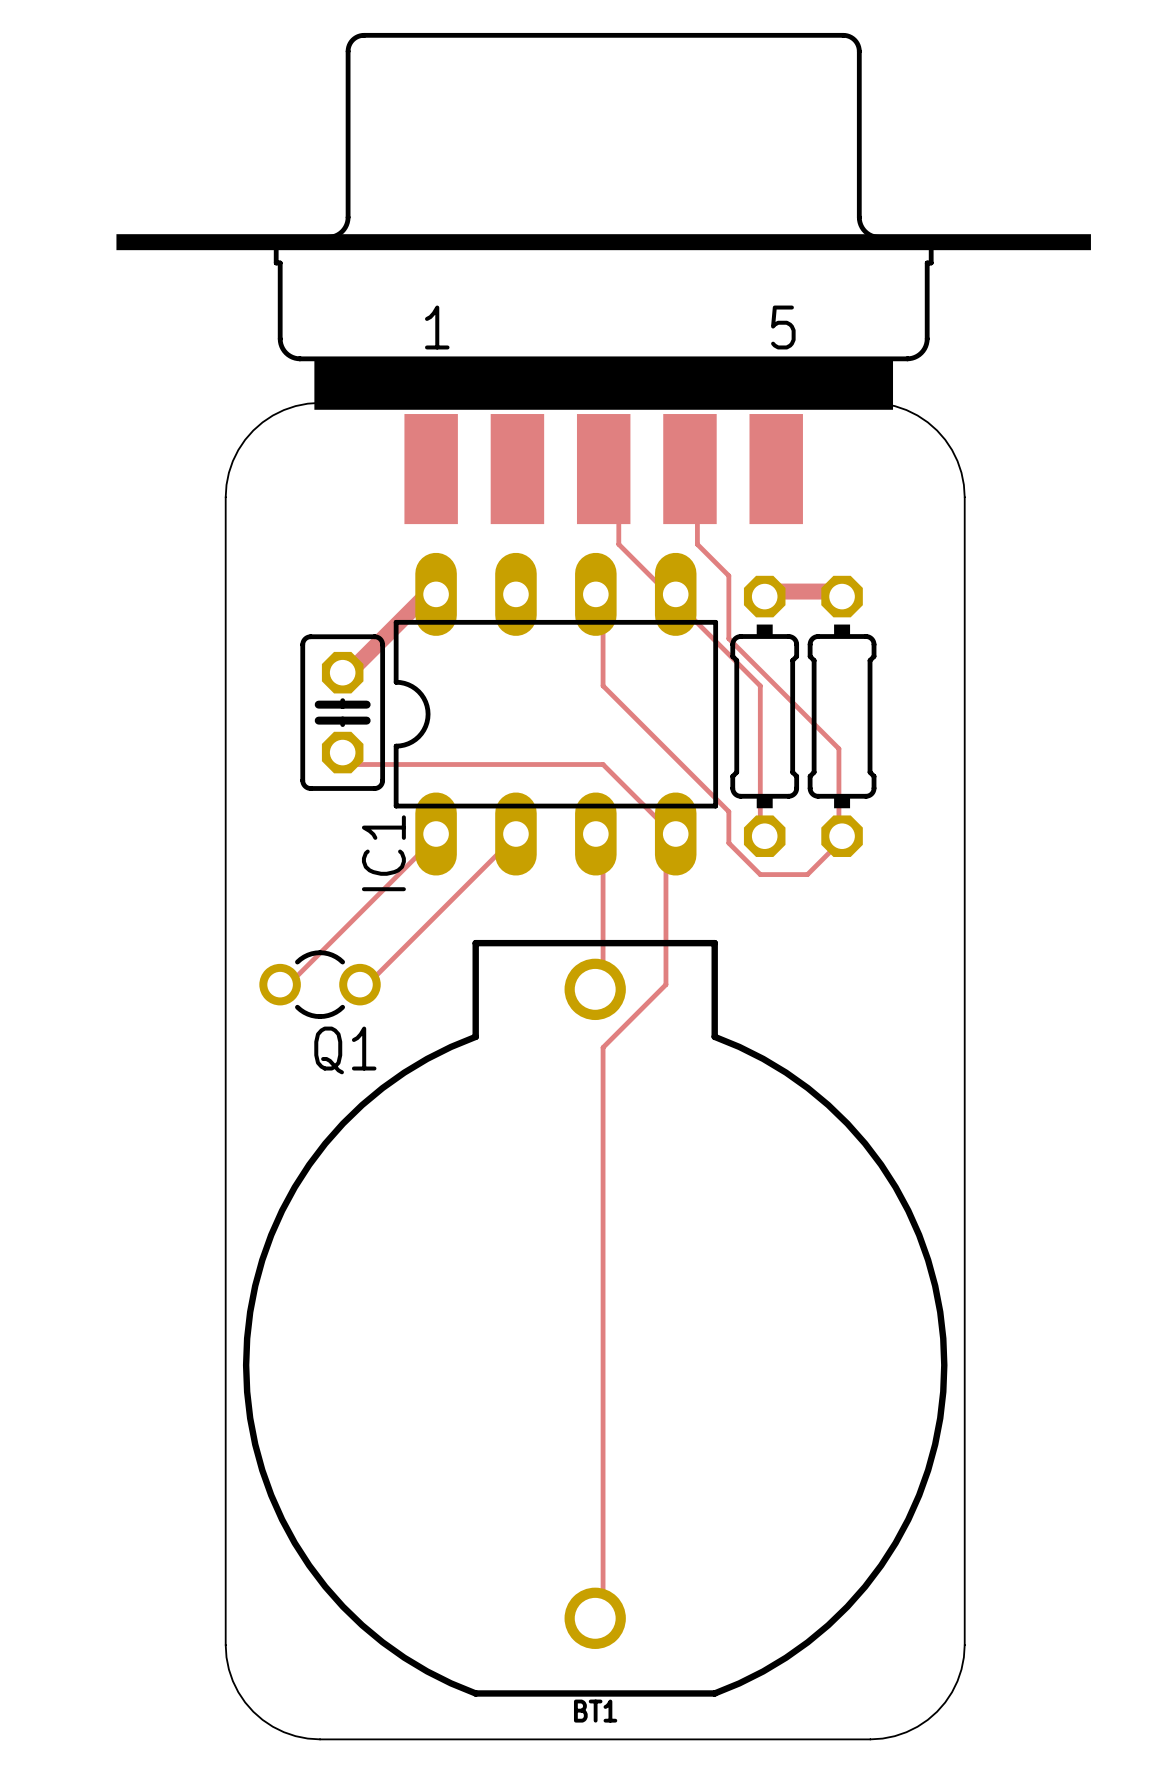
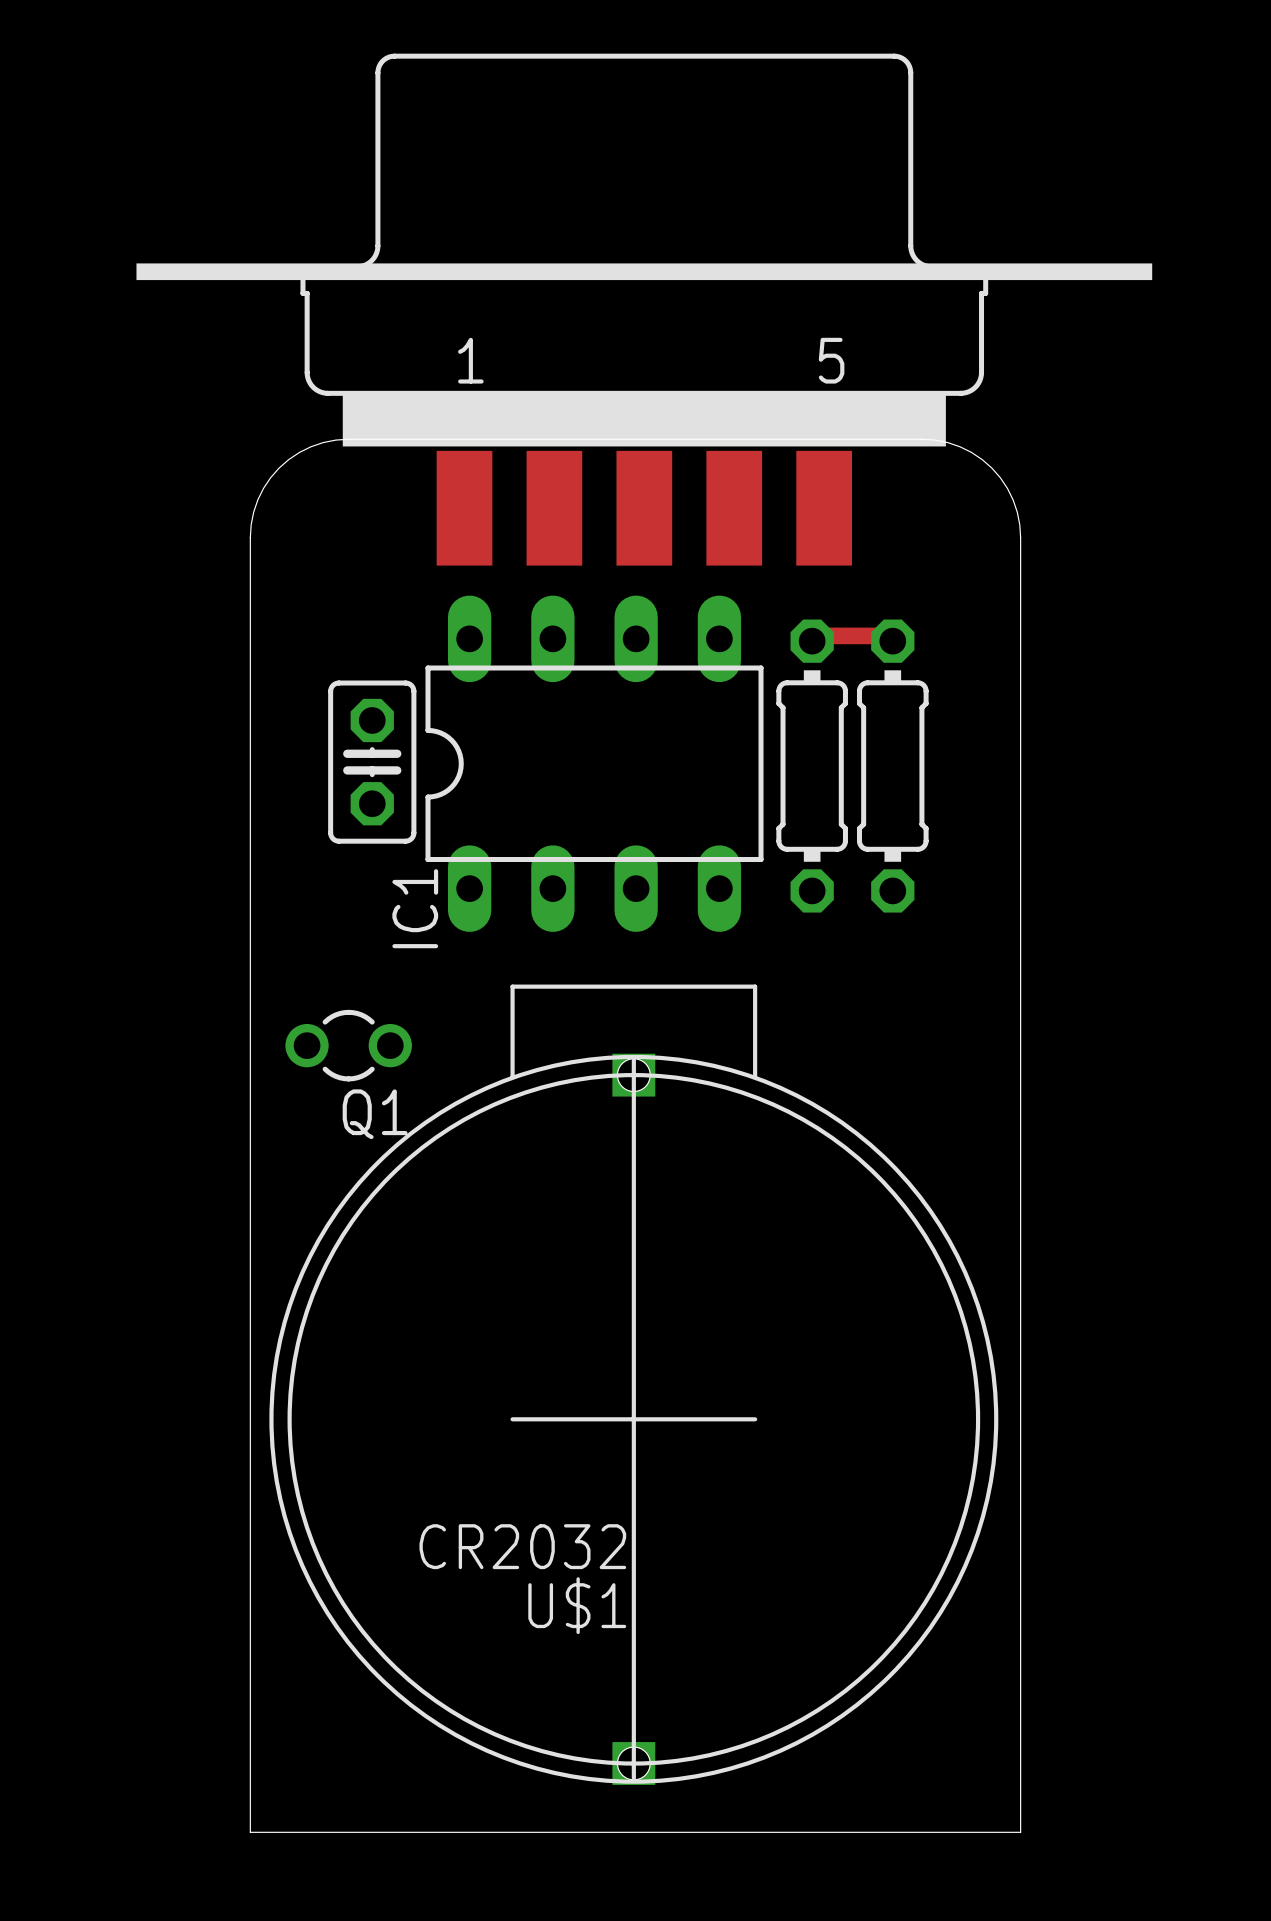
track: (603, 469) (618, 481) (618, 544) (665, 591) (675, 594) (681, 607) (760, 685) (760, 827) (764, 836) -> none
track: (689, 469) (697, 481) (697, 544) (728, 575) (728, 638) (838, 748) (838, 827) (842, 836) (838, 843) (807, 874) (760, 874) (728, 843) (728, 811) (603, 685) (603, 607) (595, 594) -> none
track: (436, 594) (430, 591) (351, 670) (342, 672) -> none
track: (342, 752) (351, 764) (603, 764) (665, 827) (675, 834) (665, 843) (665, 984) (603, 1047) (603, 1613) (595, 1618) -> none
track: (436, 834) (430, 843) (288, 984) (280, 984) -> none
track: (515, 834) (367, 984) (359, 984) -> none
track: (595, 834) (603, 843) (603, 984) (595, 989) -> none
U$1: none -> CR2032 (633, 1384)
BT1: (595, 1318) -> none
board edge: (225, 1645) (228, 1669) (232, 1681) (245, 1702) (253, 1711) (262, 1719) (283, 1732) (295, 1736) (320, 1739) -> (250, 1733) (250, 1832) (348, 1832)
board edge: (964, 1645) (961, 1669) (957, 1681) (945, 1702) (937, 1711) (927, 1719) (906, 1732) (894, 1736) (870, 1739) -> (1020, 1733) (1020, 1832) (922, 1832)

